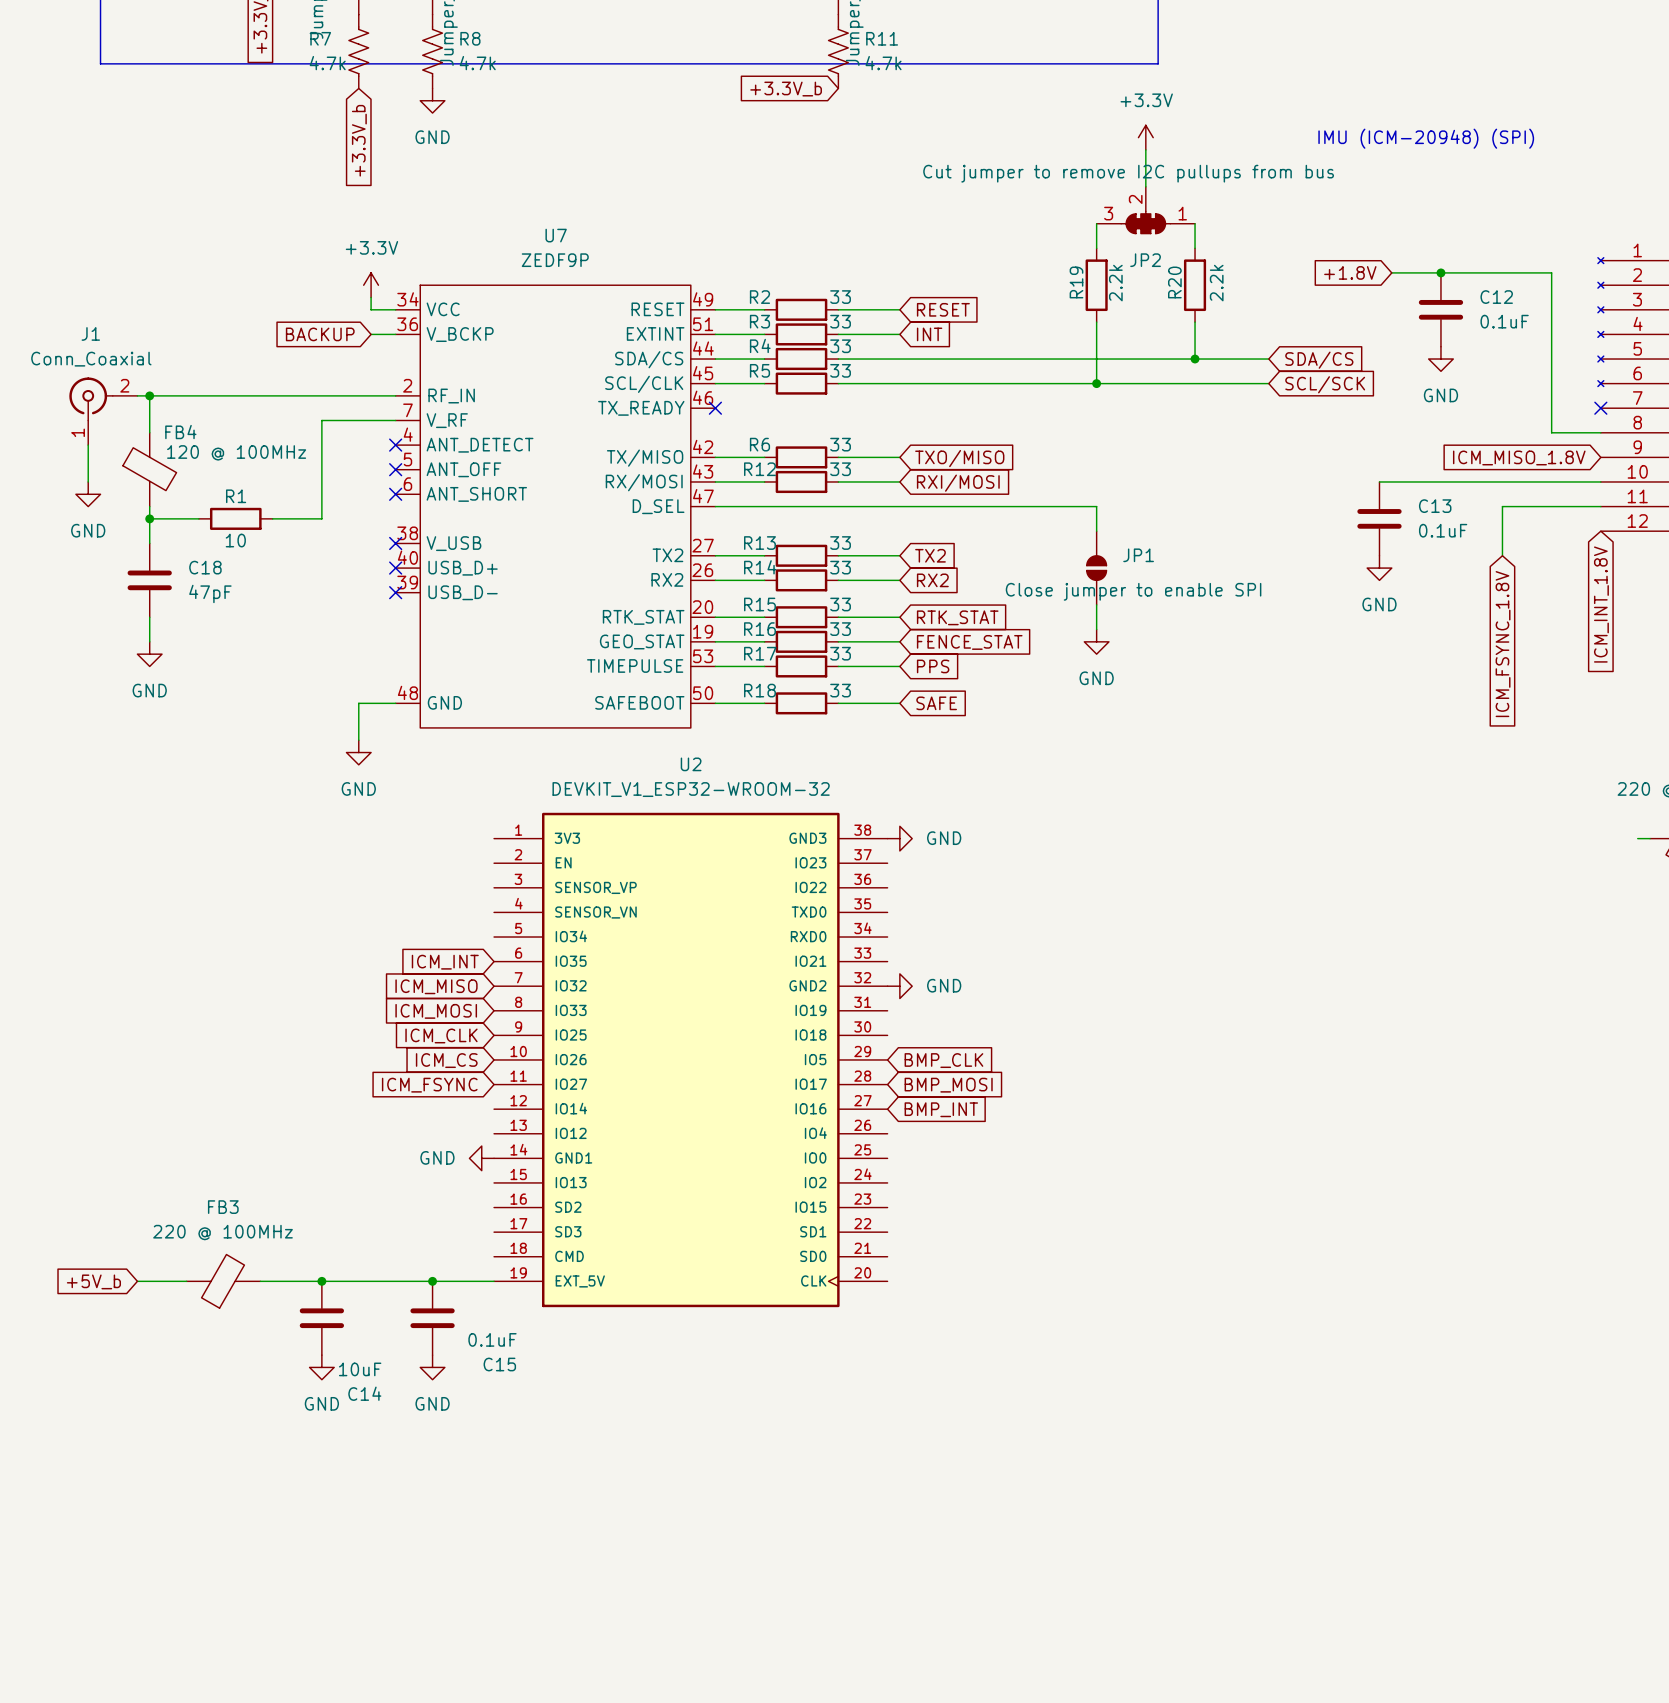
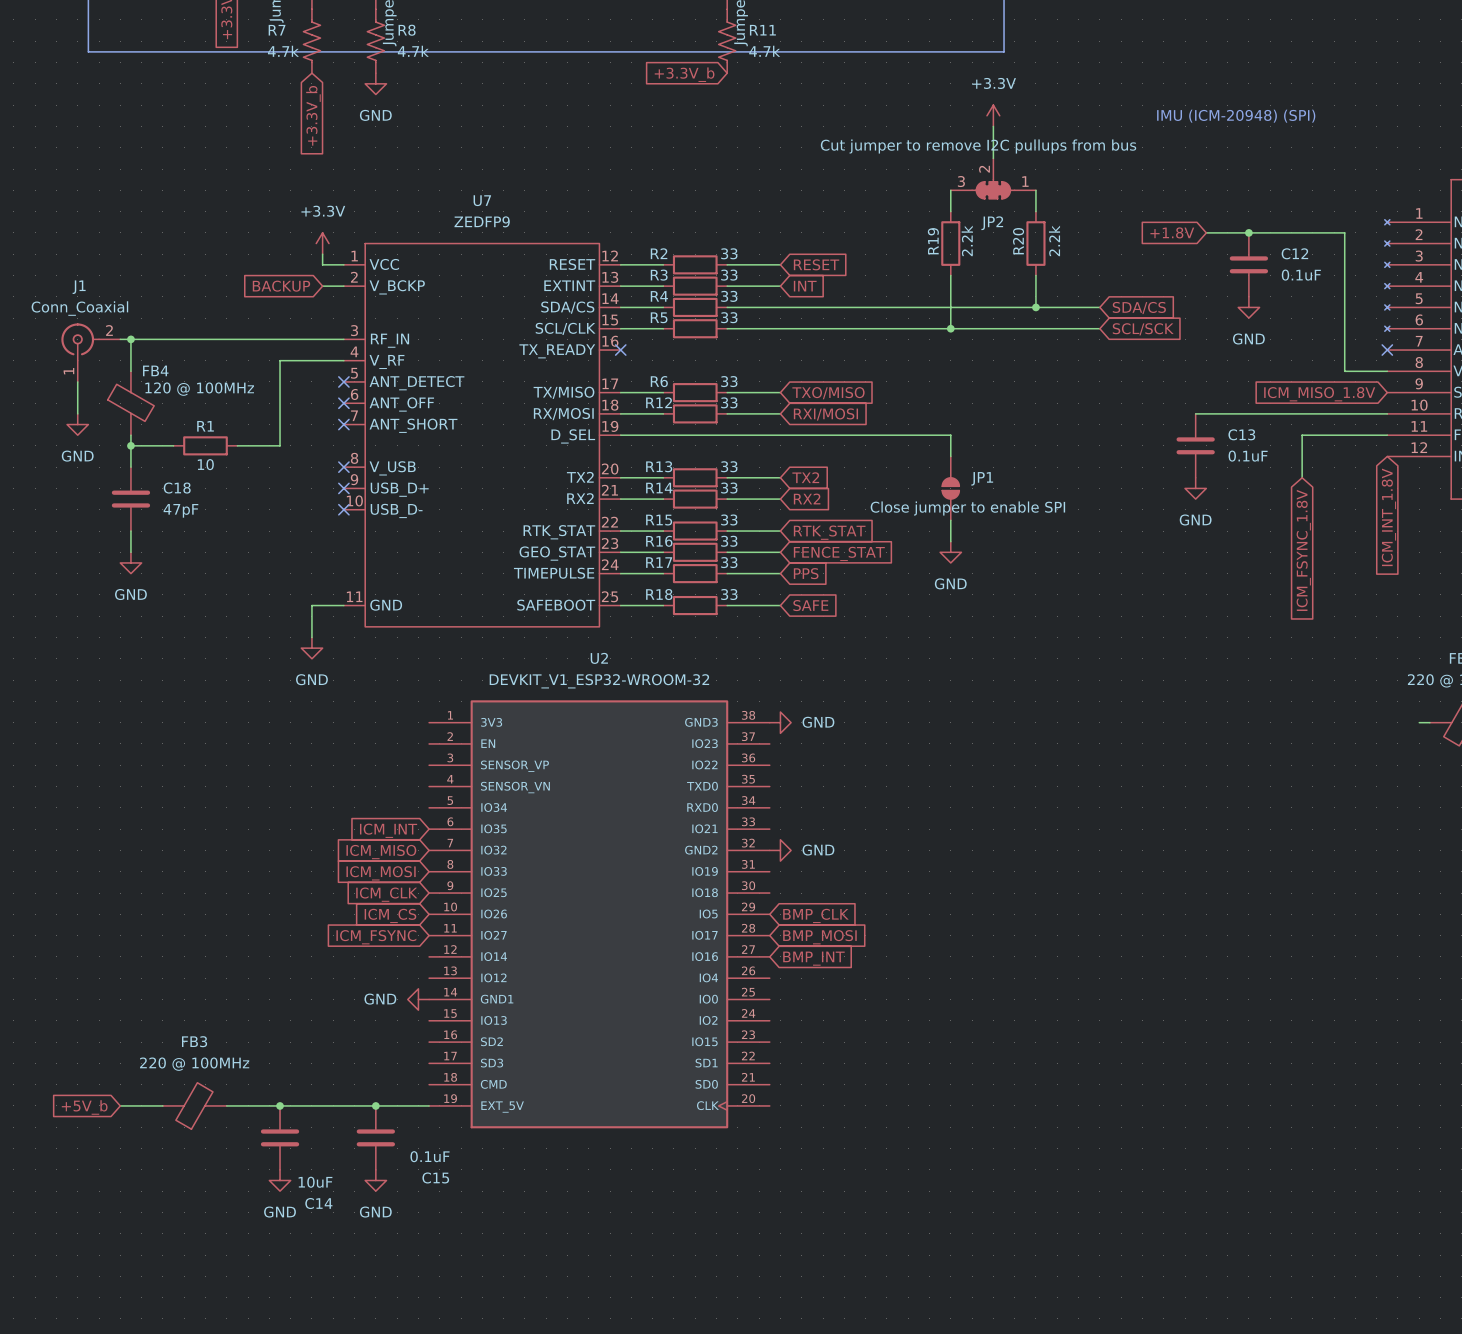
U7 value: ZEDF9P (555, 260) -> ZEDFP9 (482, 221)
U7 symbol: [395, 285, 716, 728] -> [343, 243, 621, 627]

